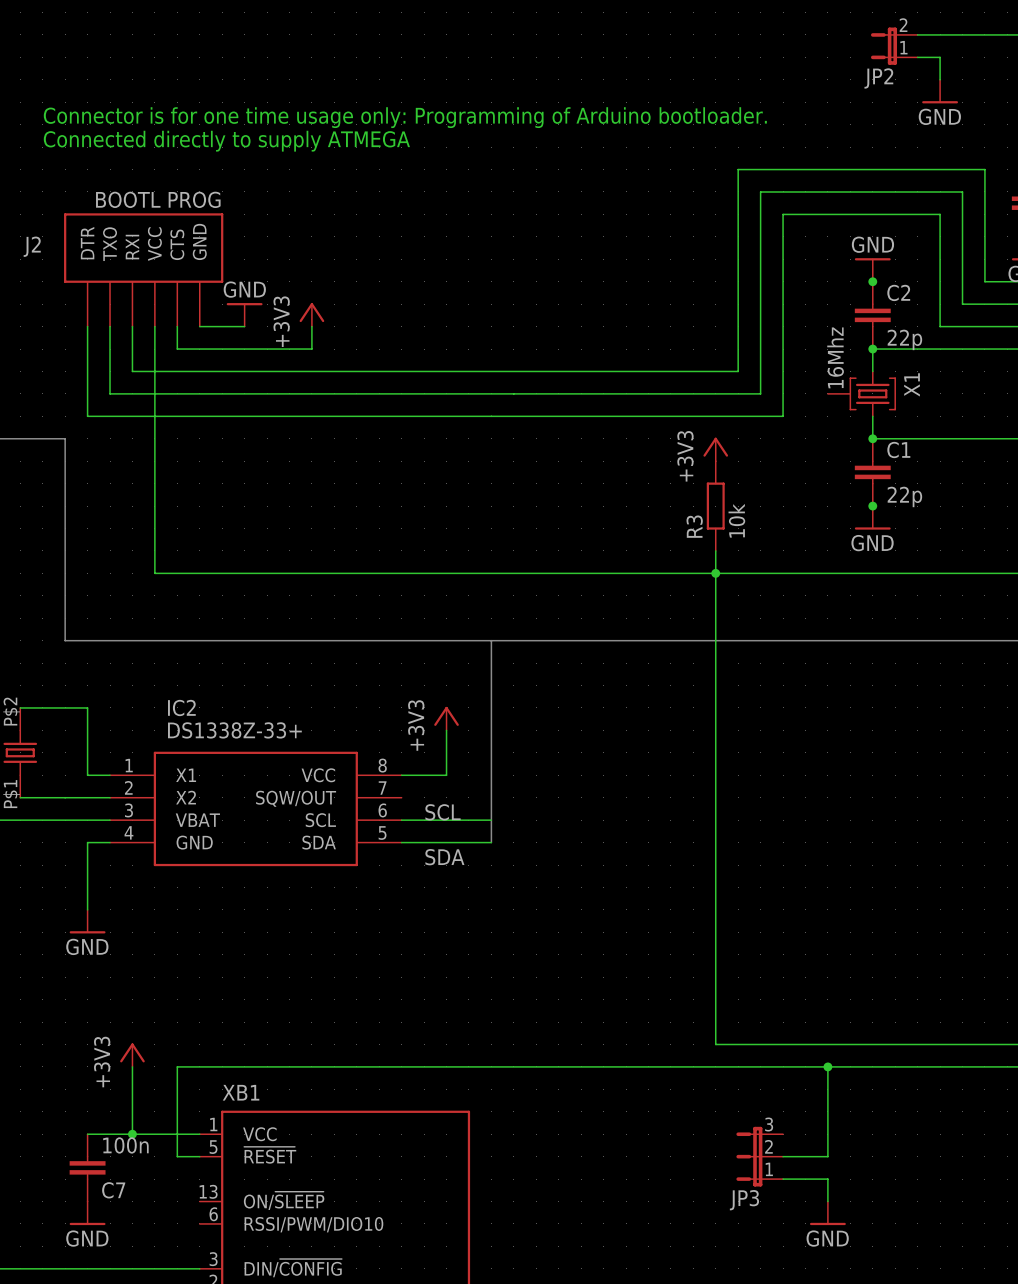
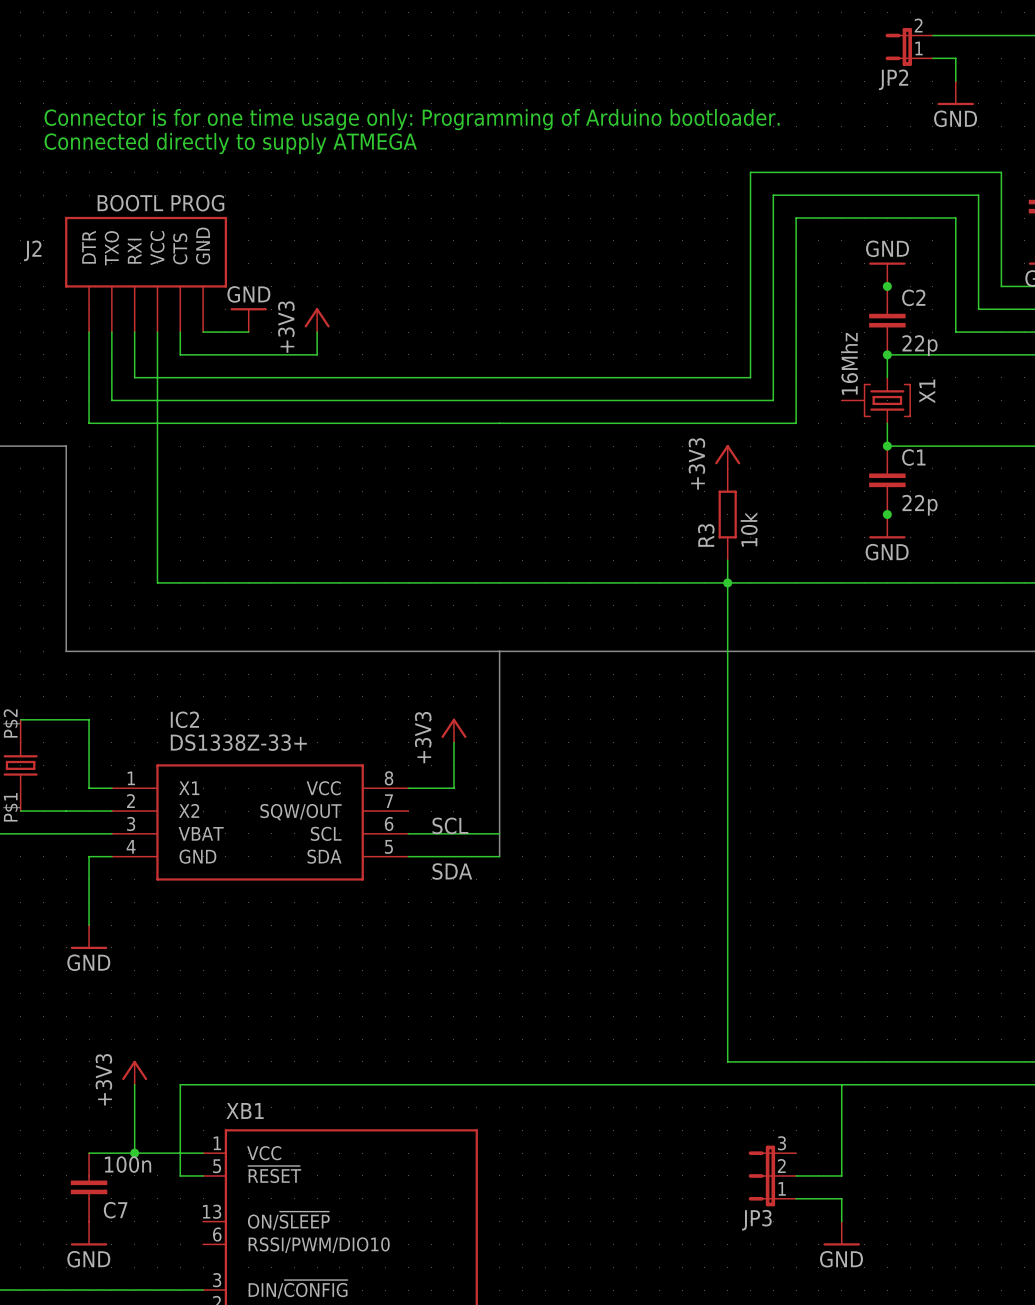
junction: (827, 1066) -> none

